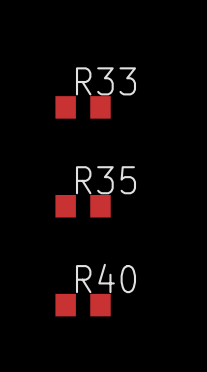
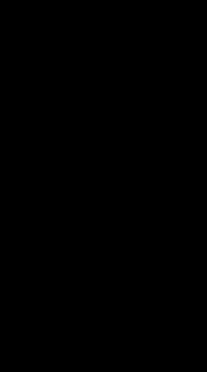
R33: (83, 107) -> none
R35: (83, 206) -> none
R40: (83, 305) -> none

